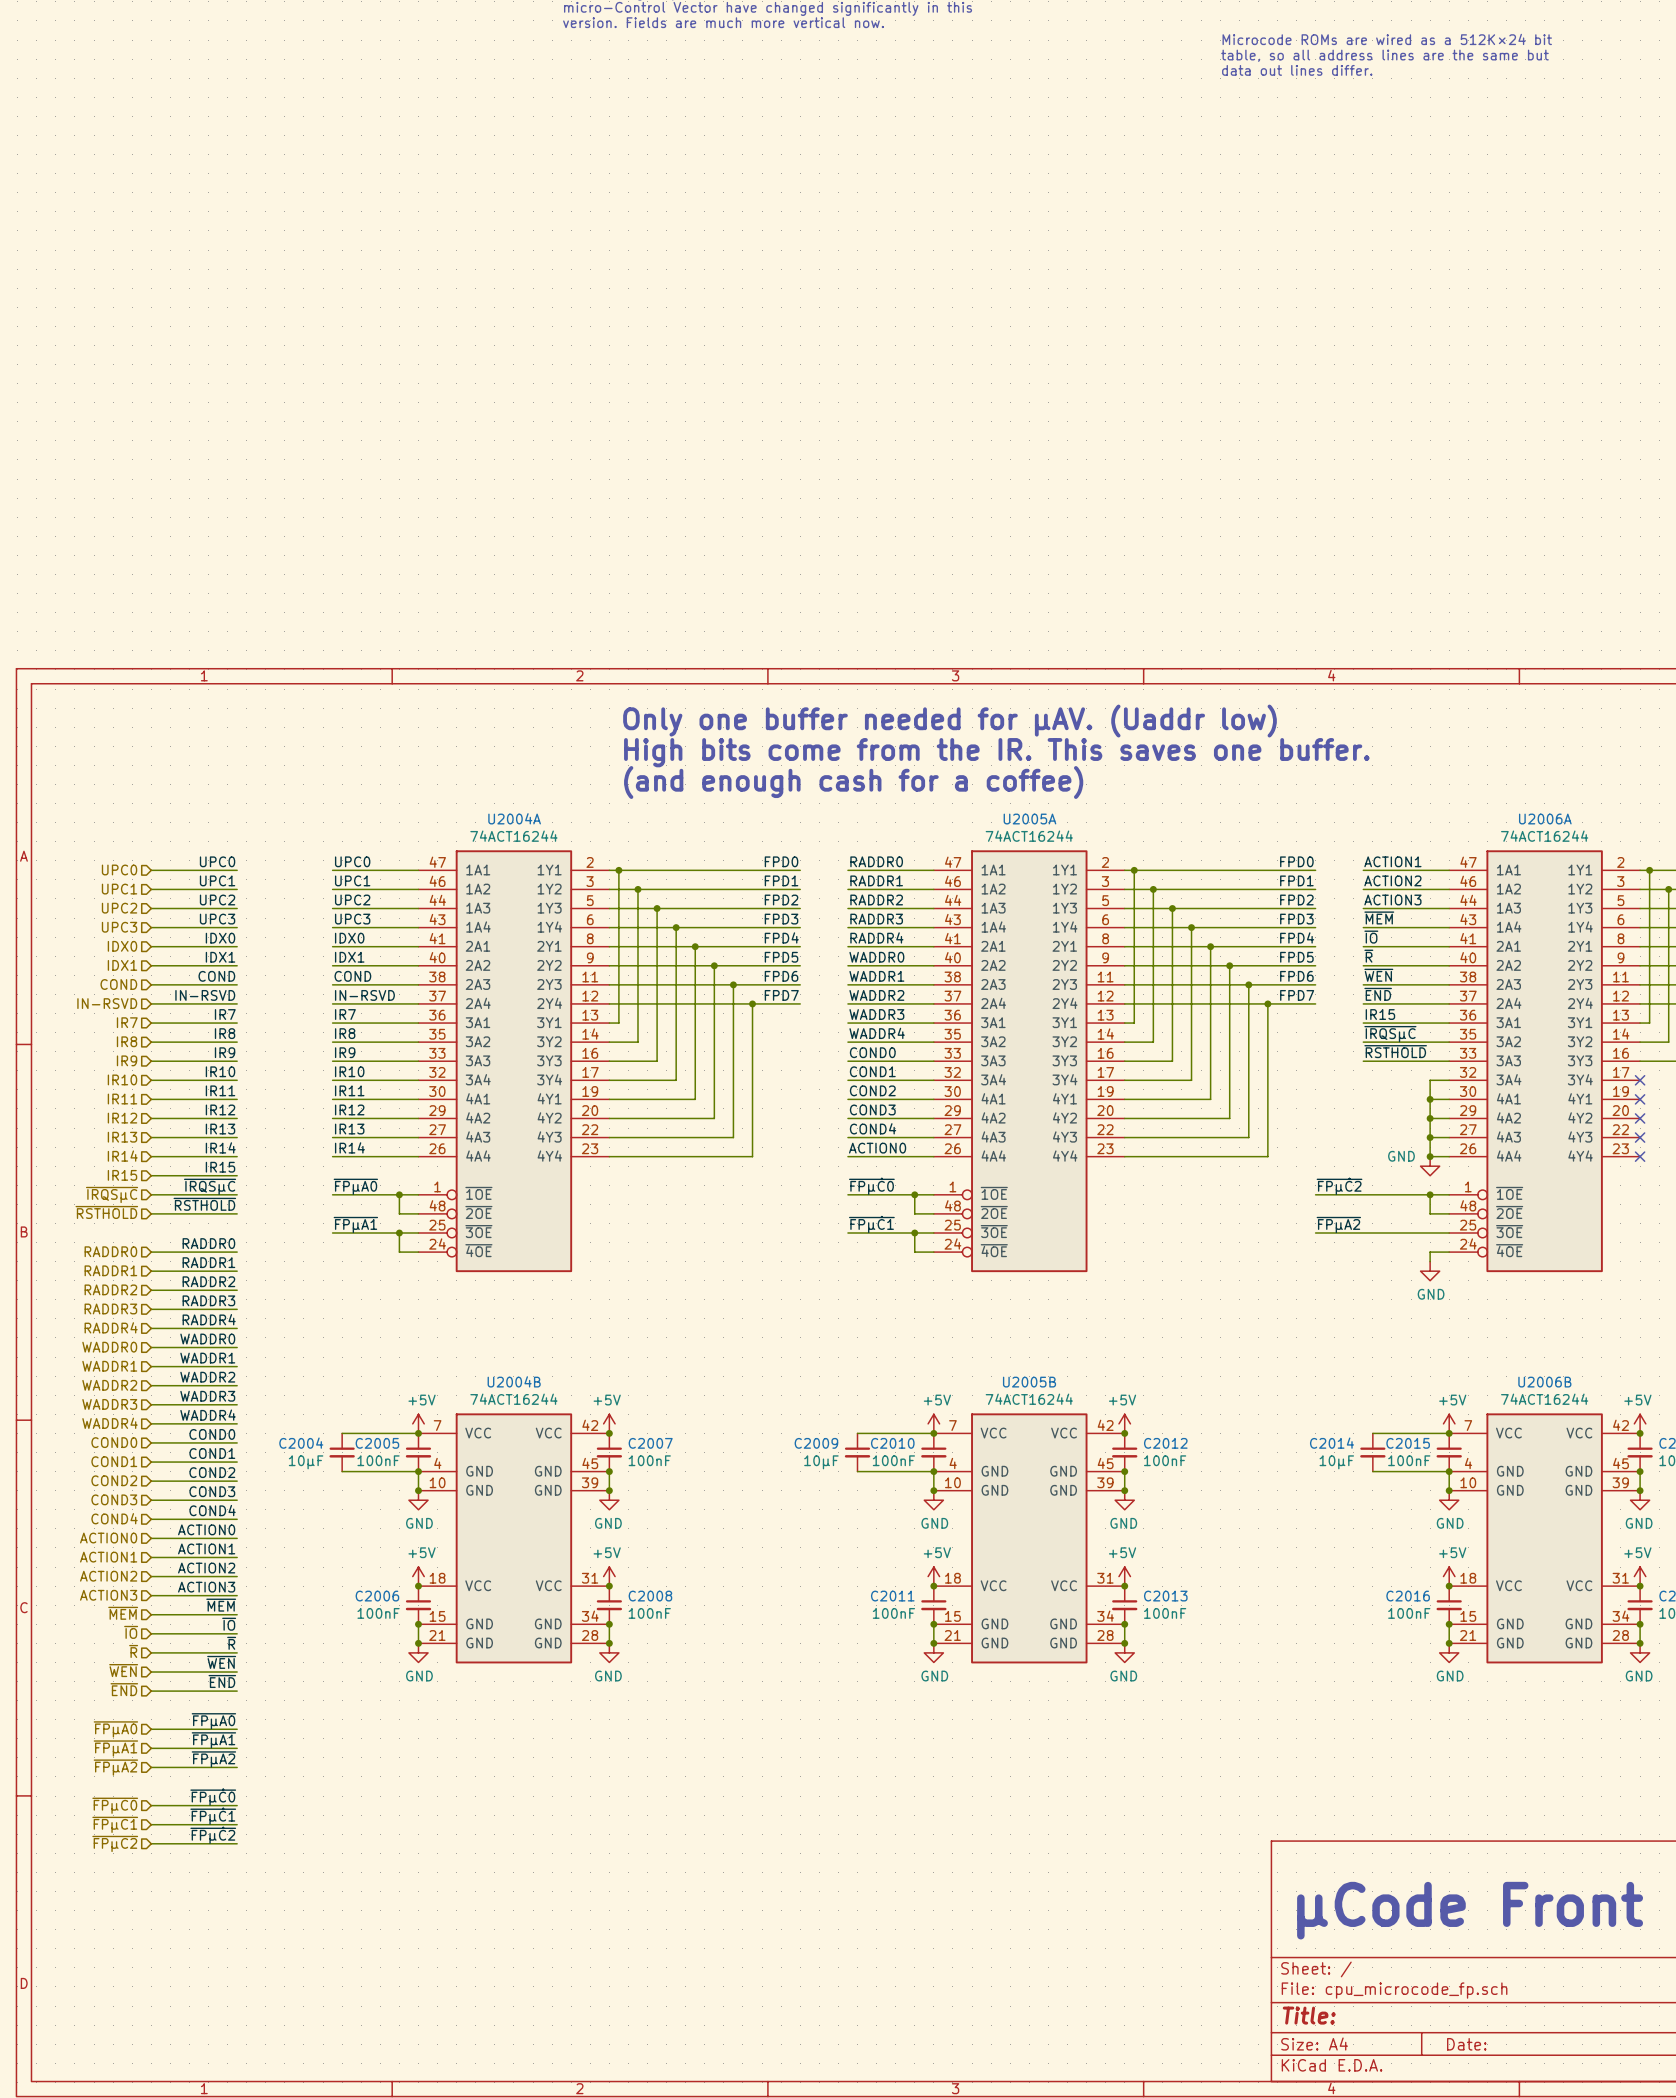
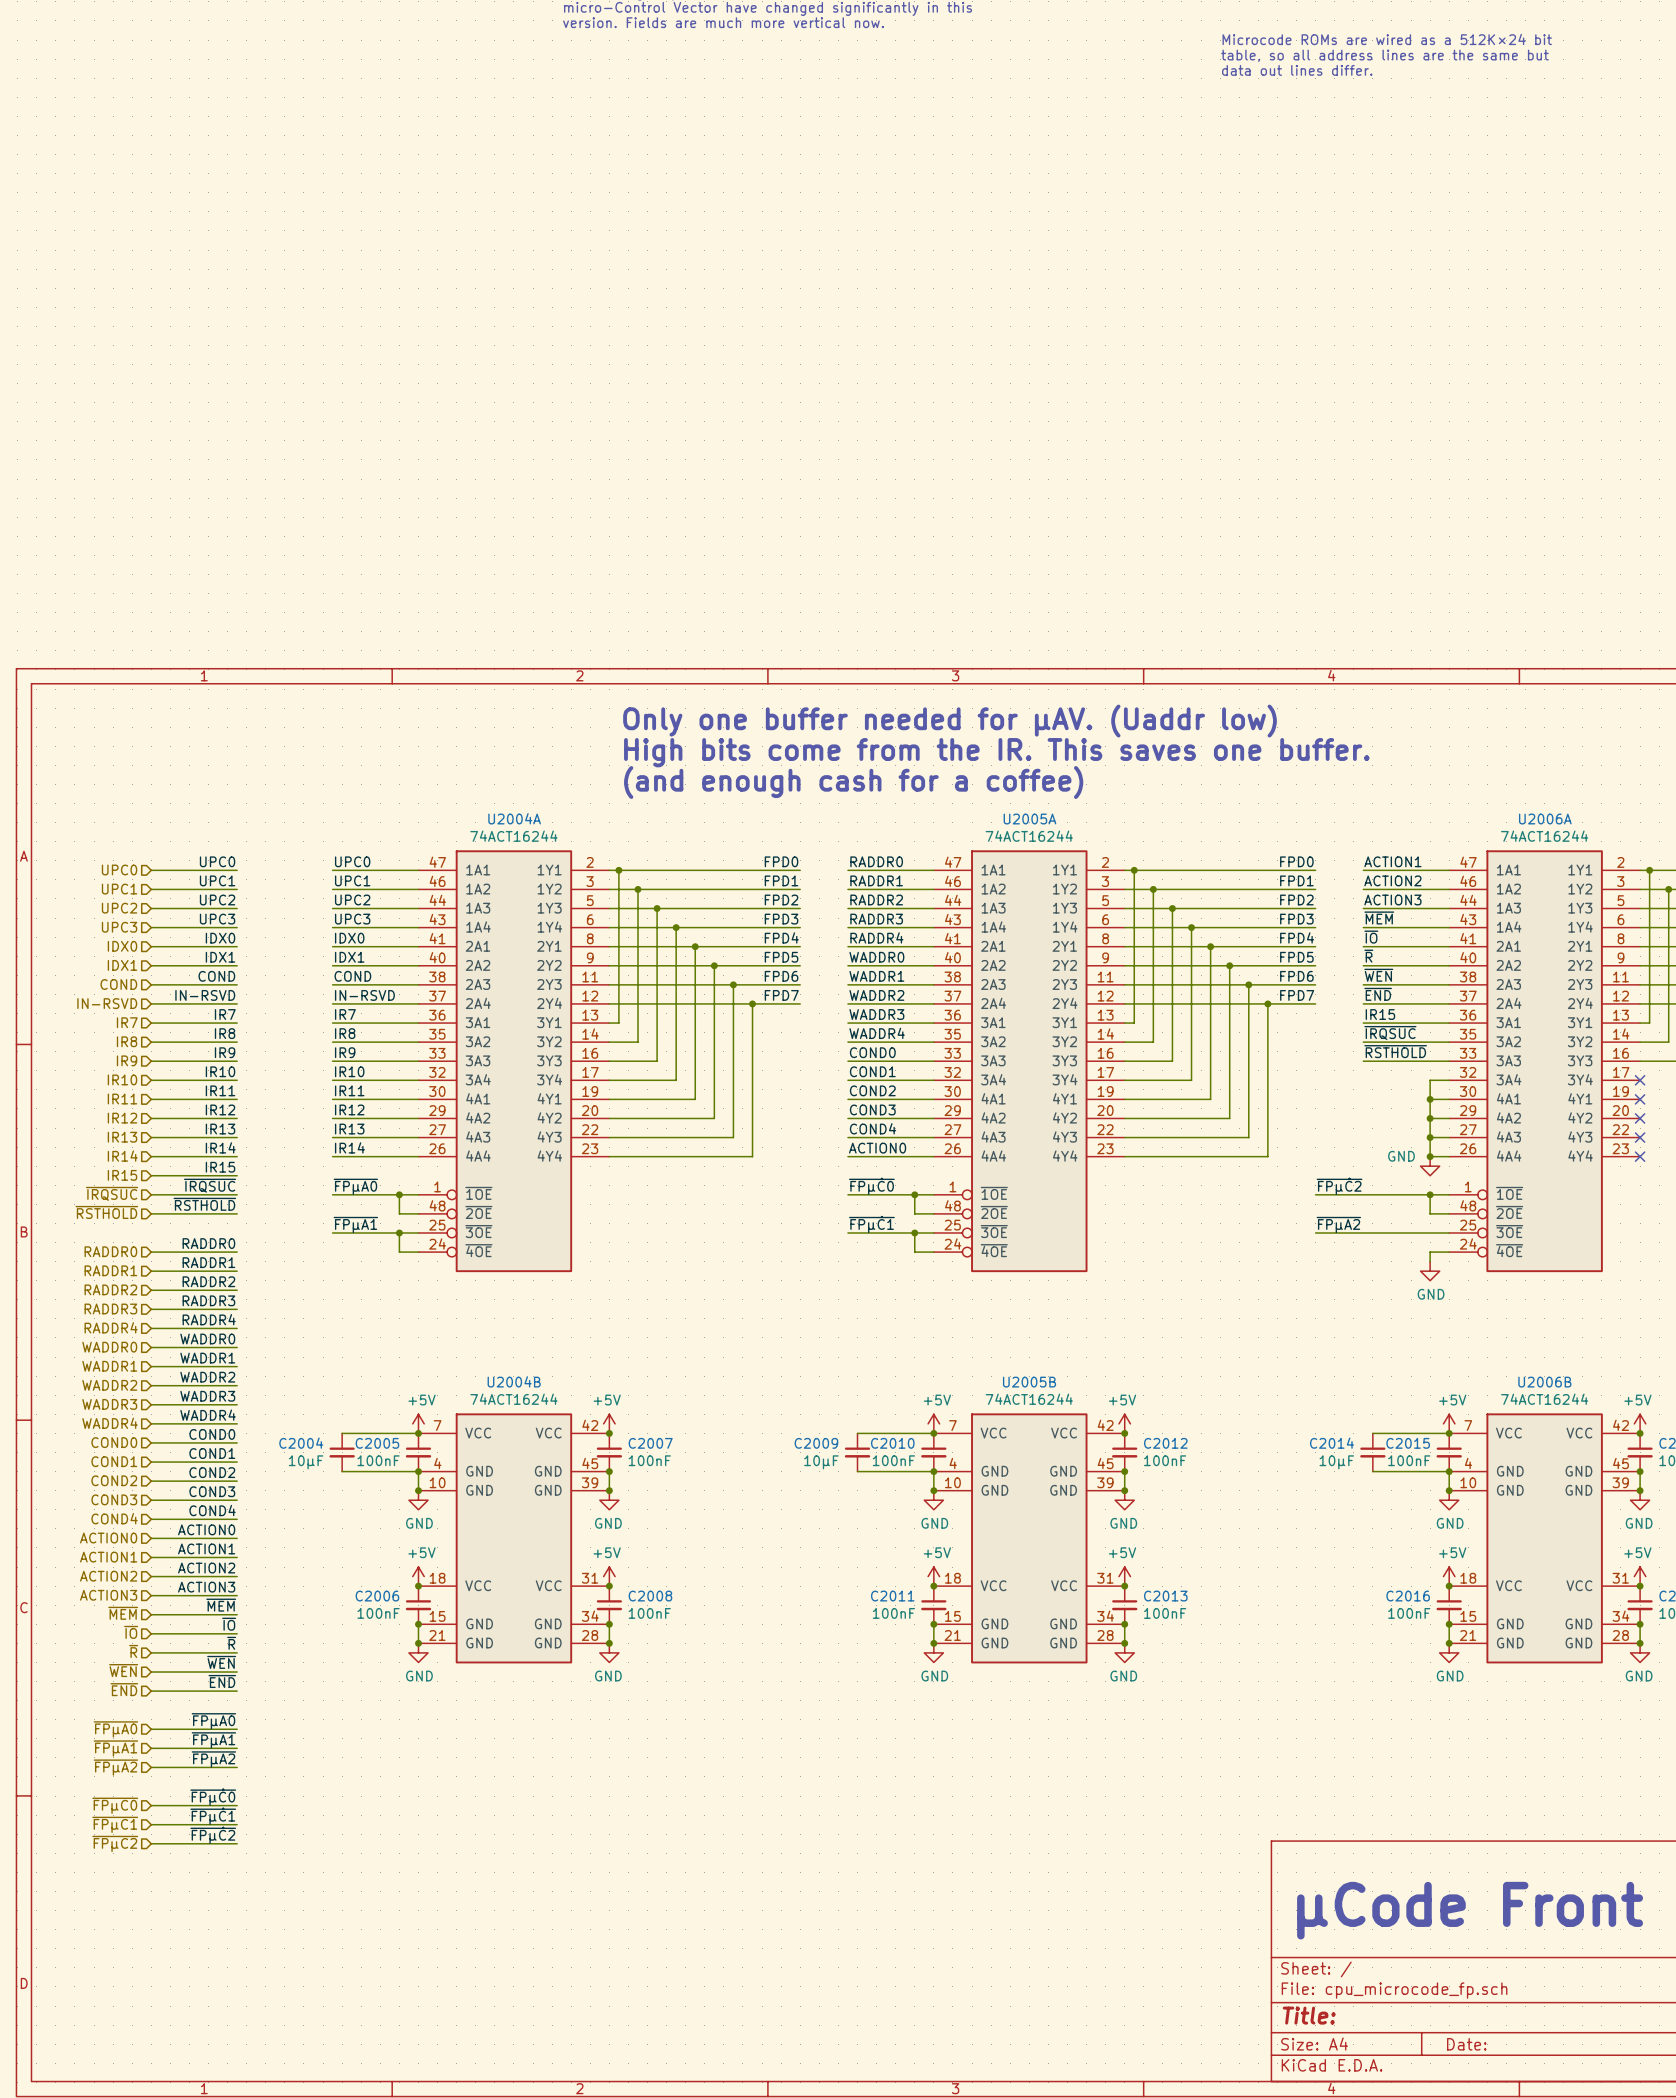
label: ~{IRQSµC} (1390, 1034) -> ~{IRQSUC} (1390, 1032)
label: ~{IRQSµC} (210, 1186) -> ~{IRQSUC} (210, 1185)
hierarchical label: ~{IRQSµC} (112, 1194) -> ~{IRQSUC} (112, 1193)

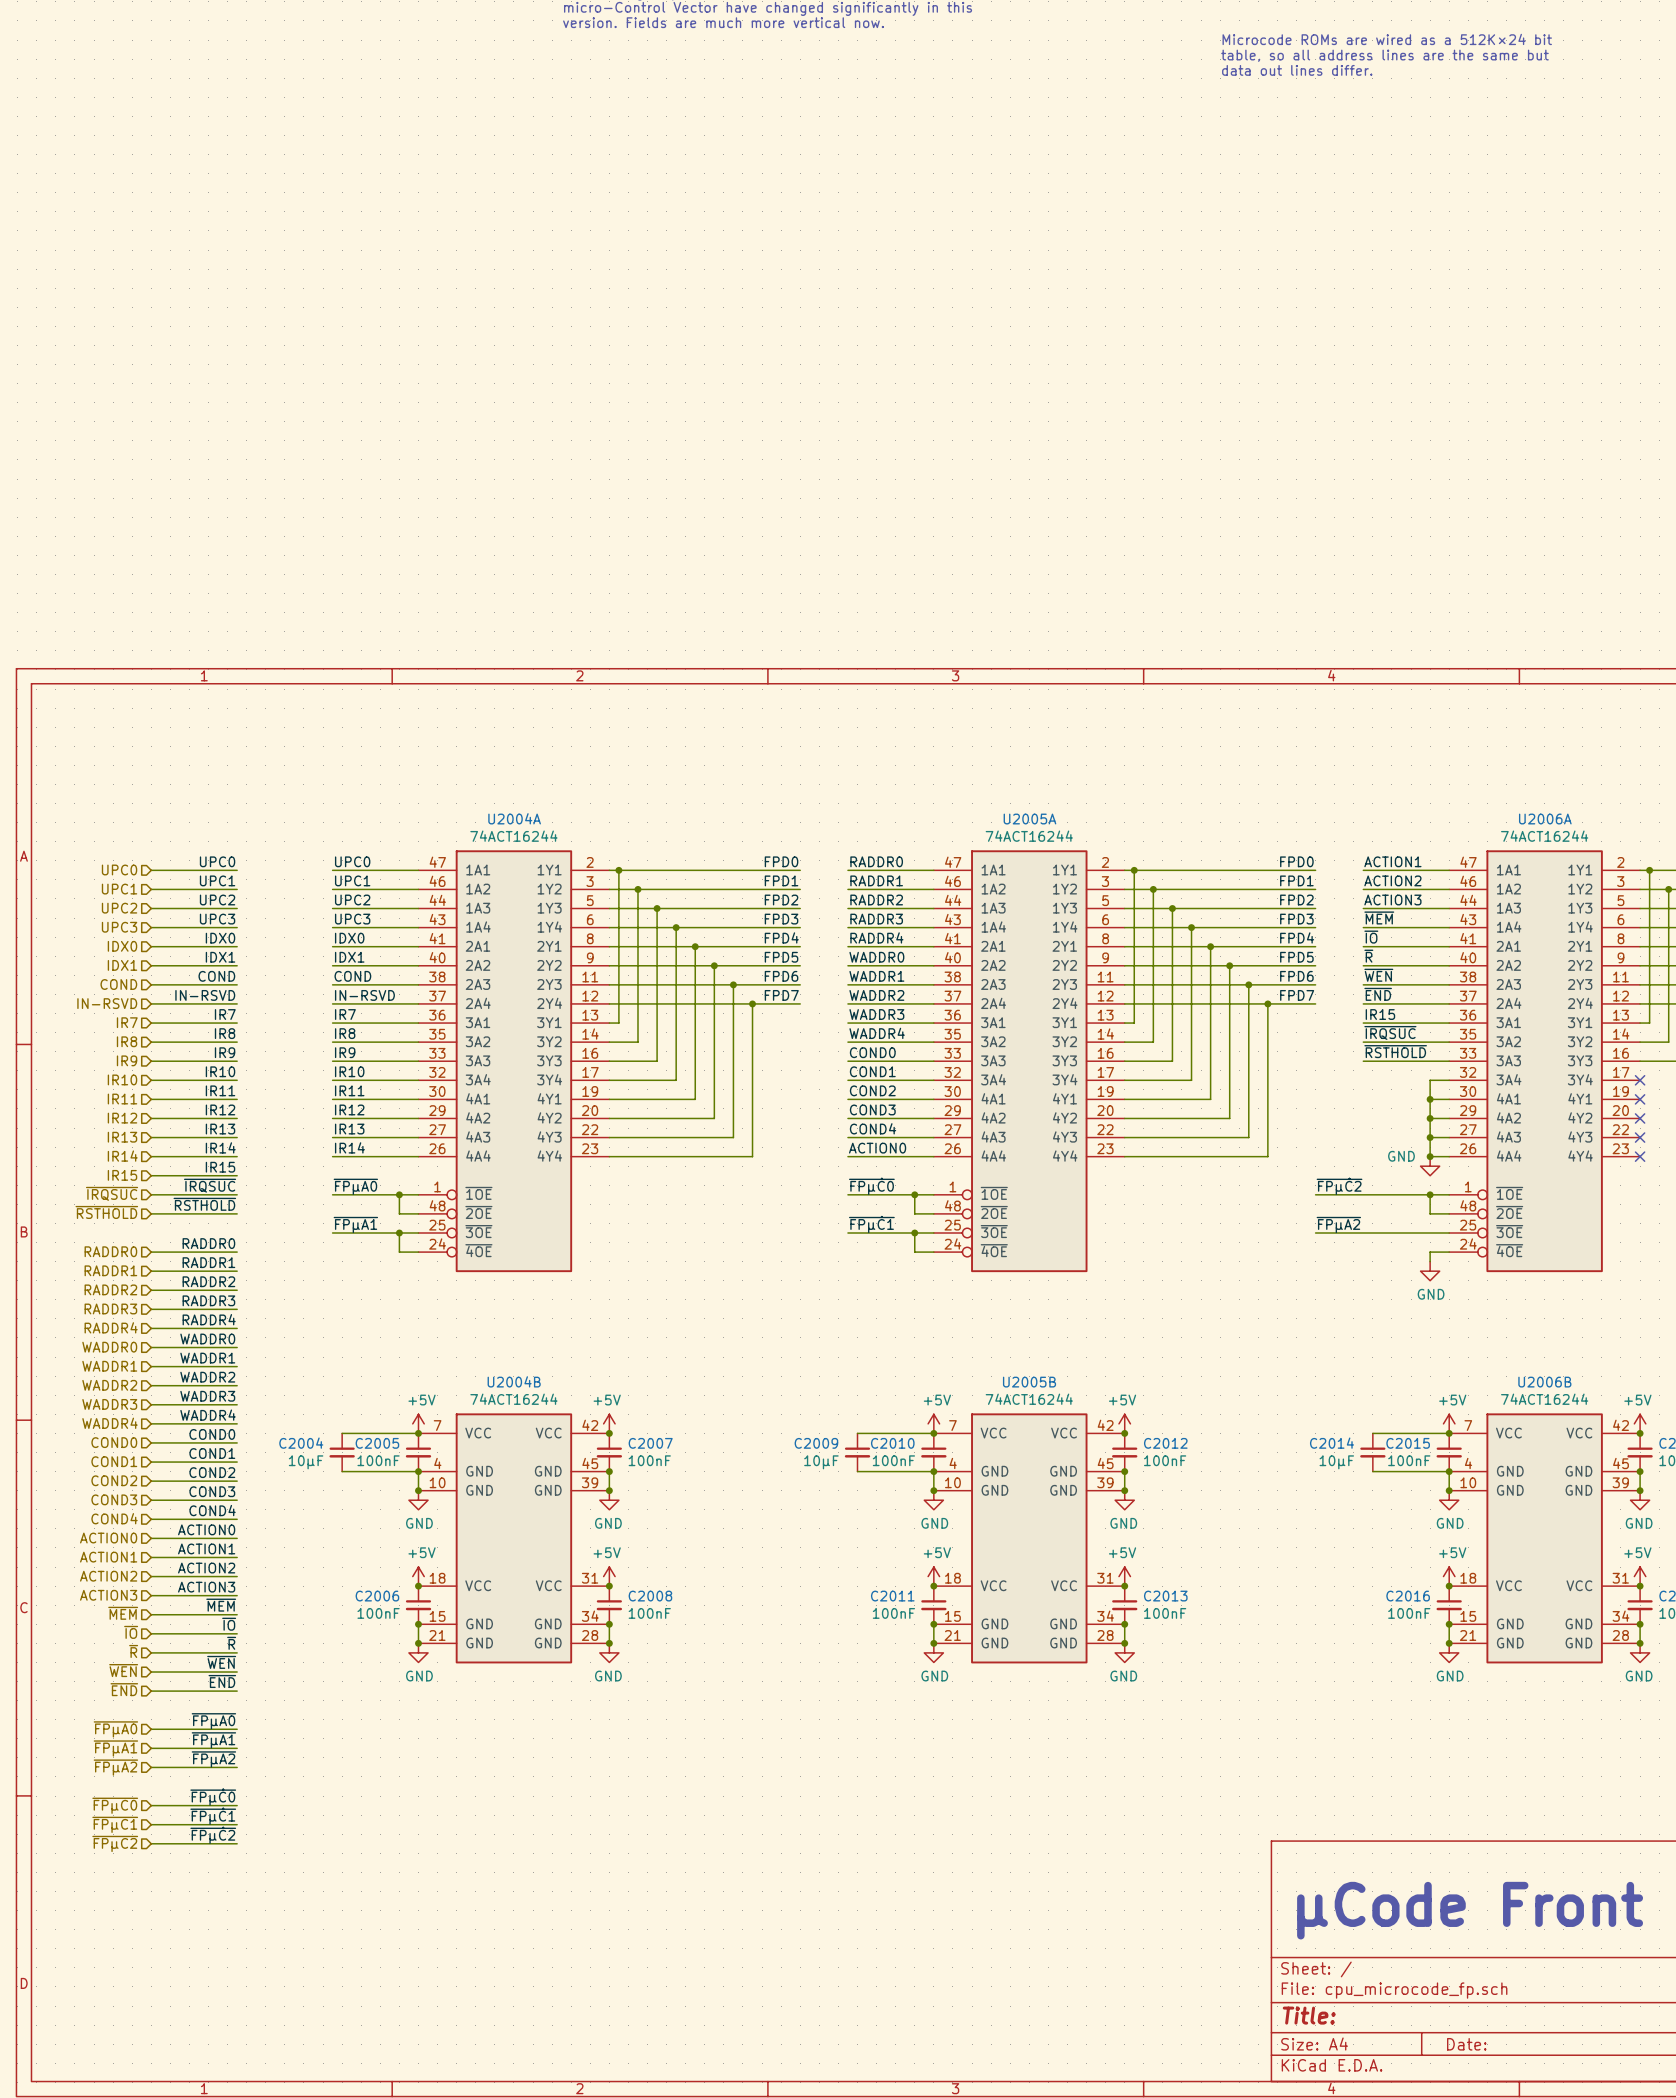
text: Only one buffer needed for µAV. (Uaddr low) (949, 721) -> none
text: High bits come from the IR. This saves one buffer. (996, 752) -> none
text: (and enough cash for a coffee) (853, 782) -> none

